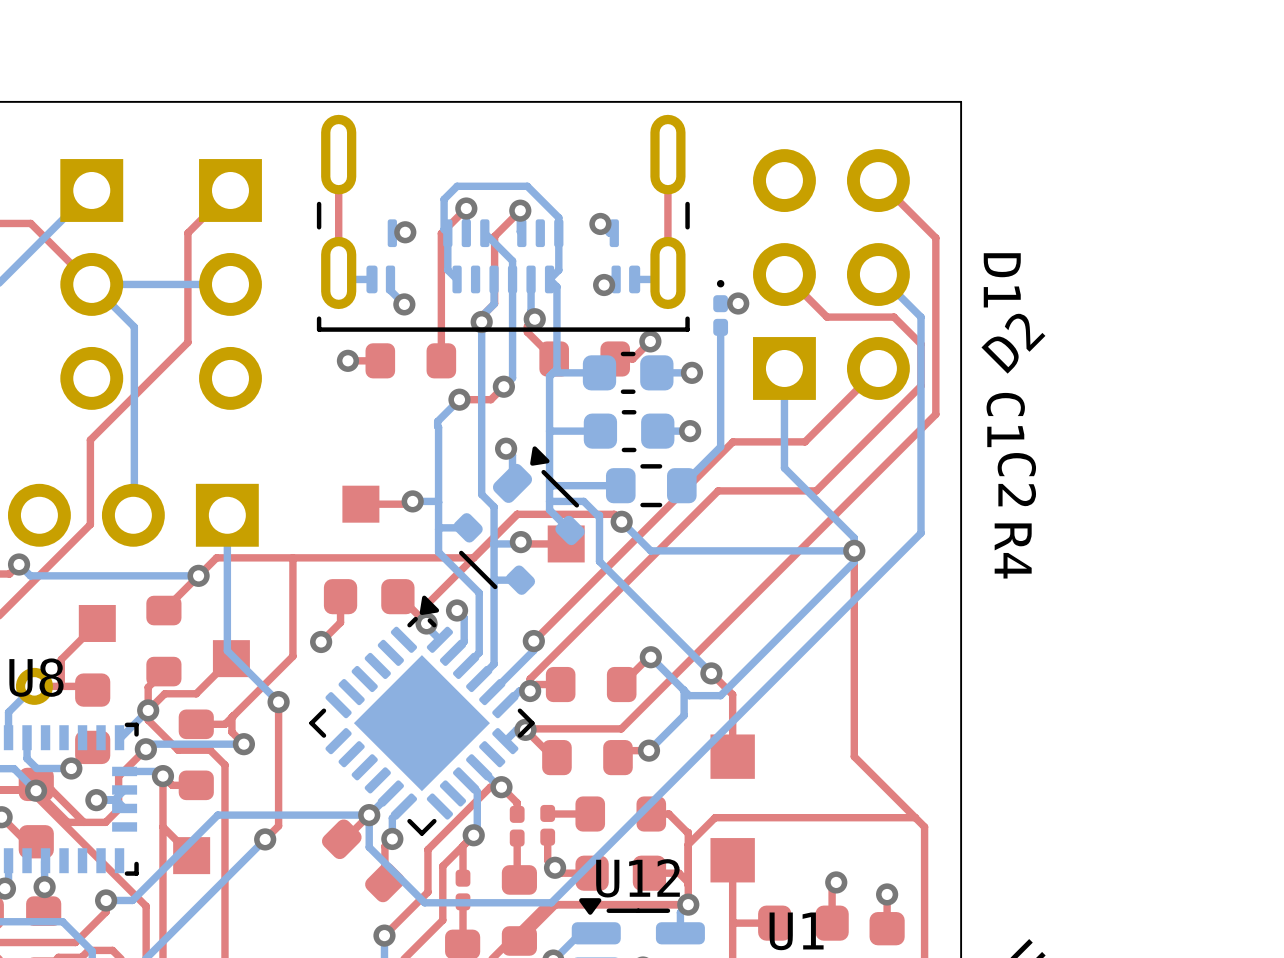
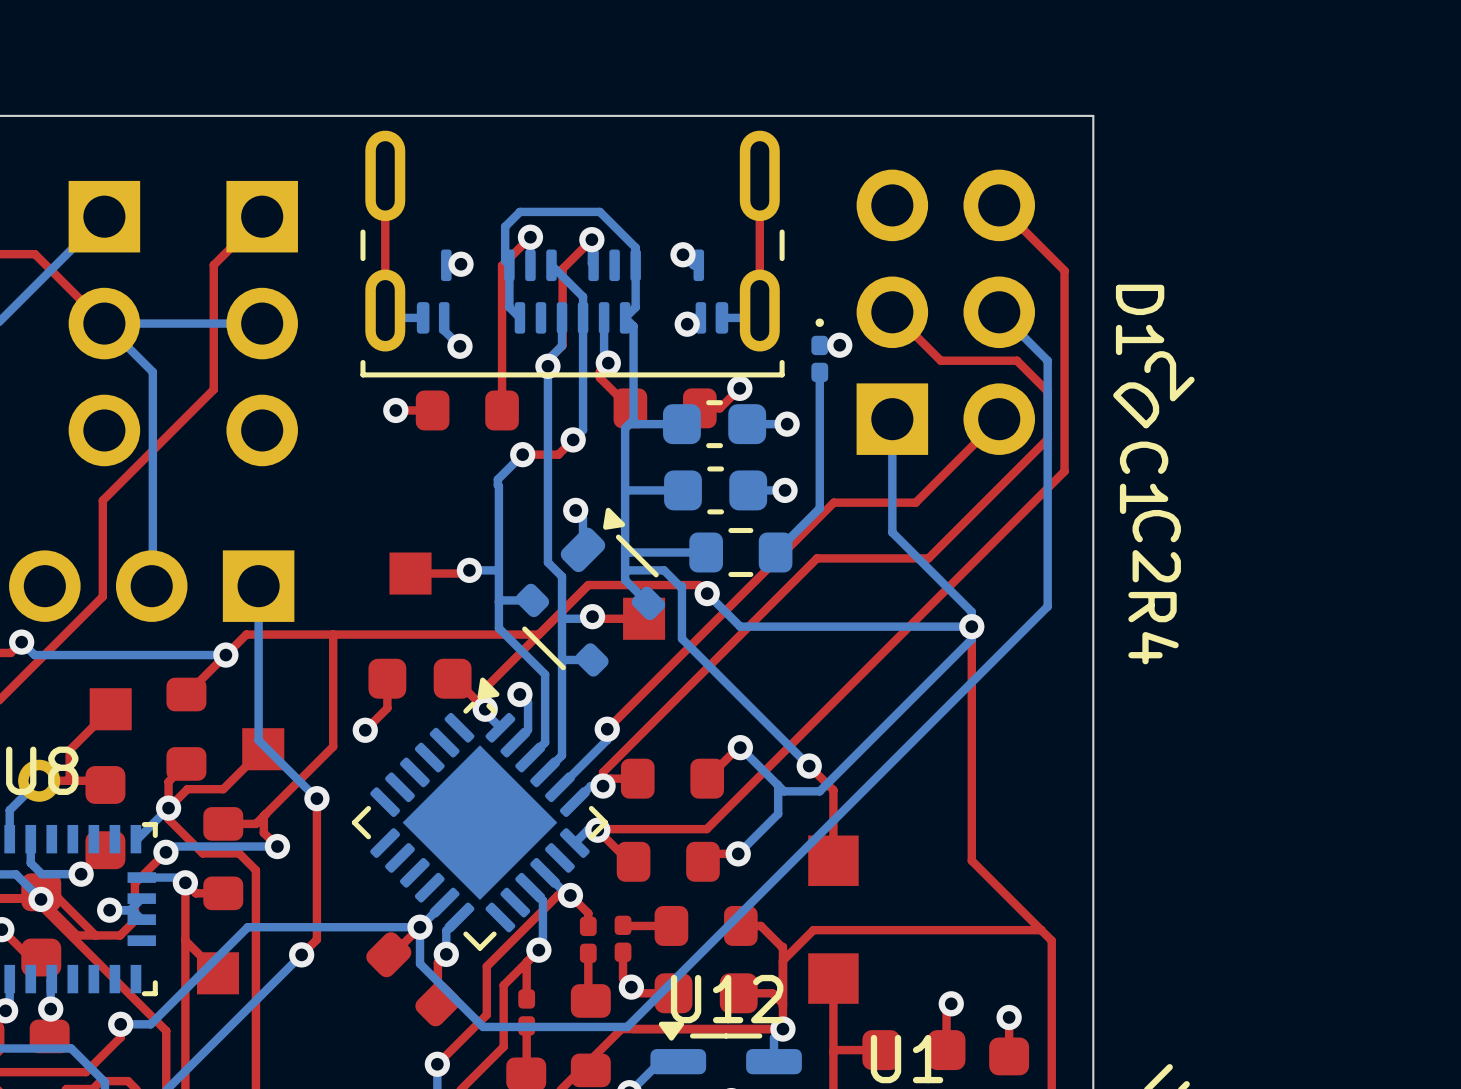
top track: (555, 904) (519, 940) -> none

